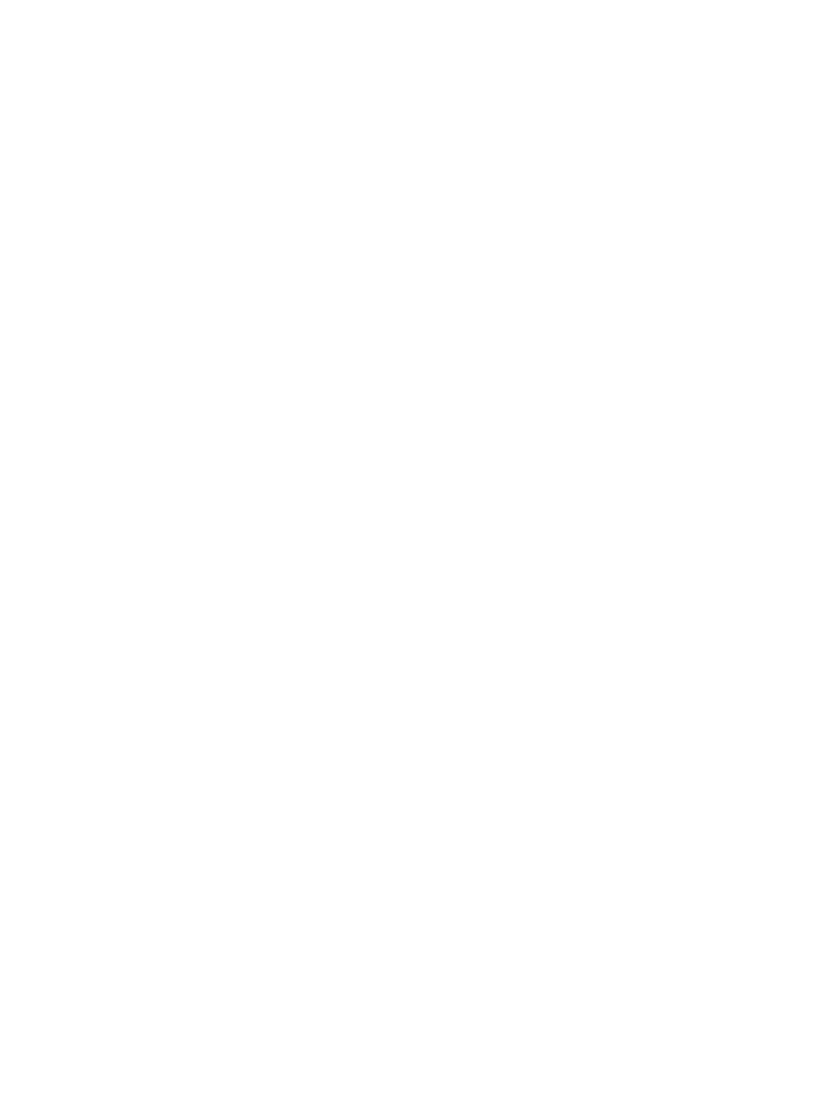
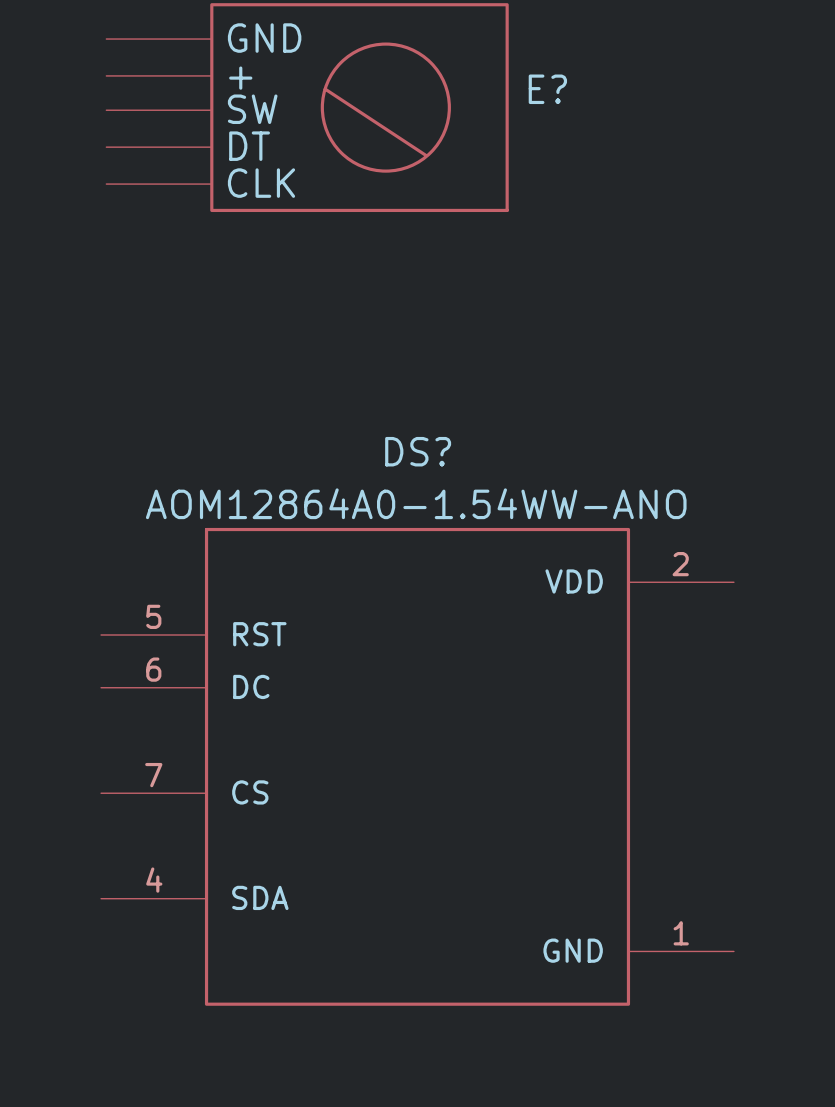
E?: none -> (307, 107)
DS?: none -> AOM12864A0-1.54WW-ANO (417, 766)

